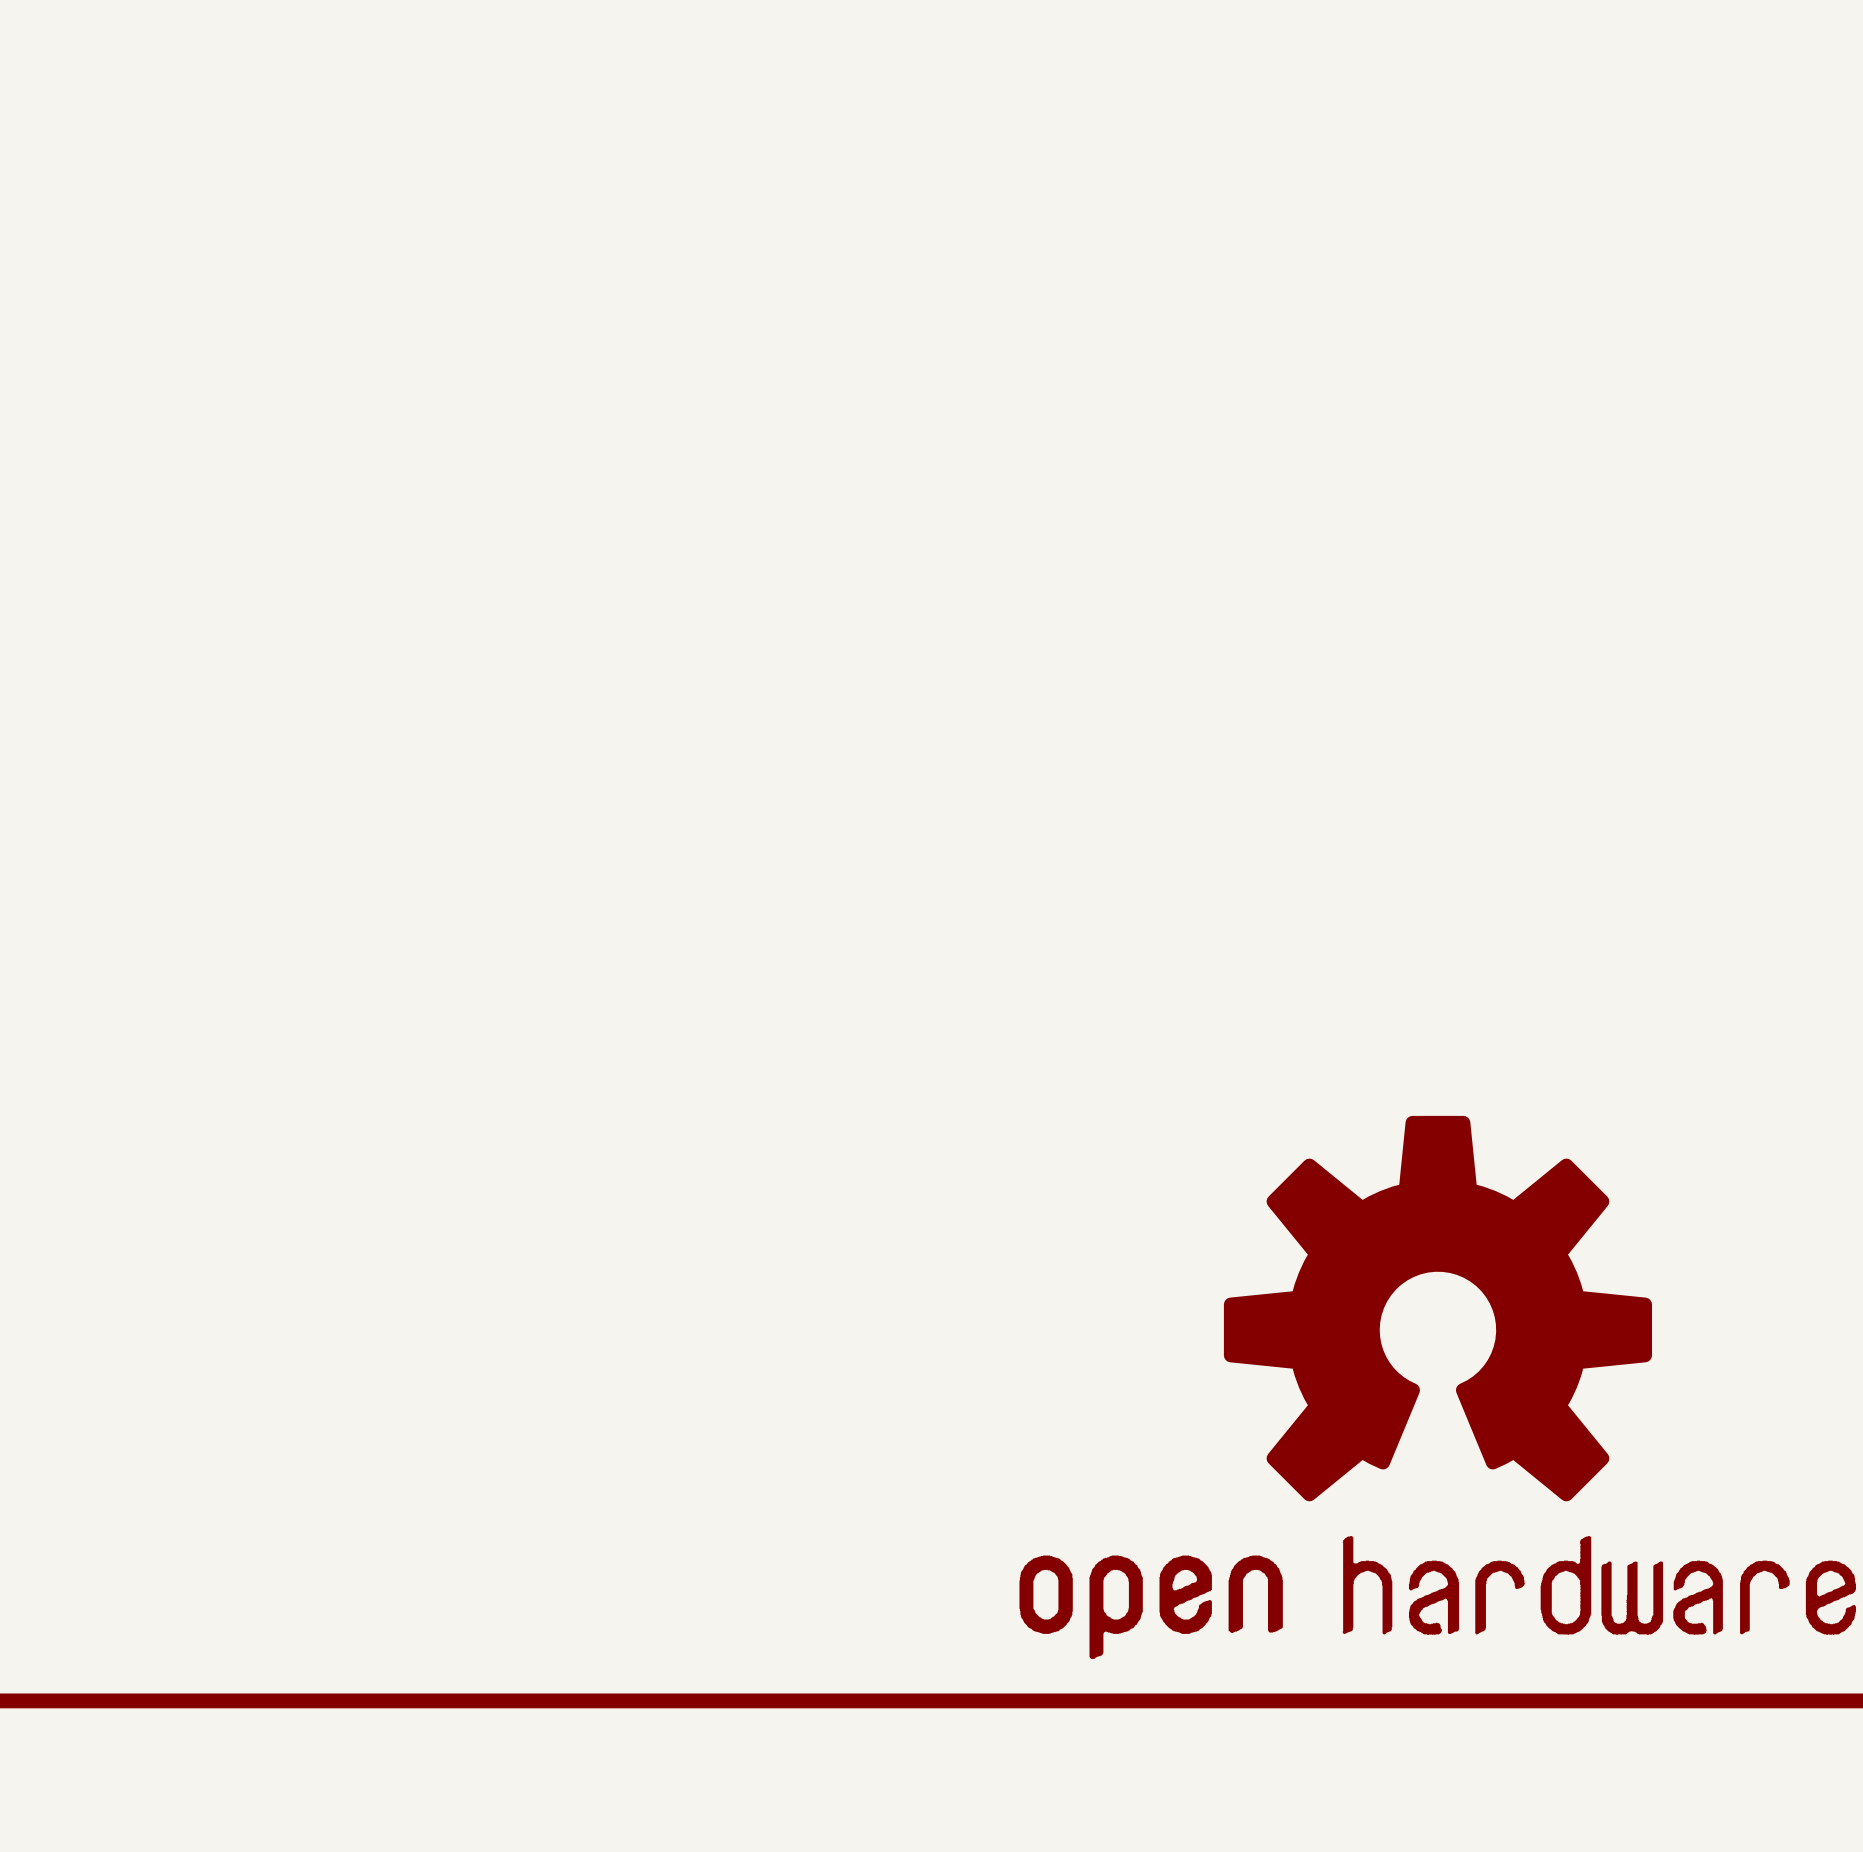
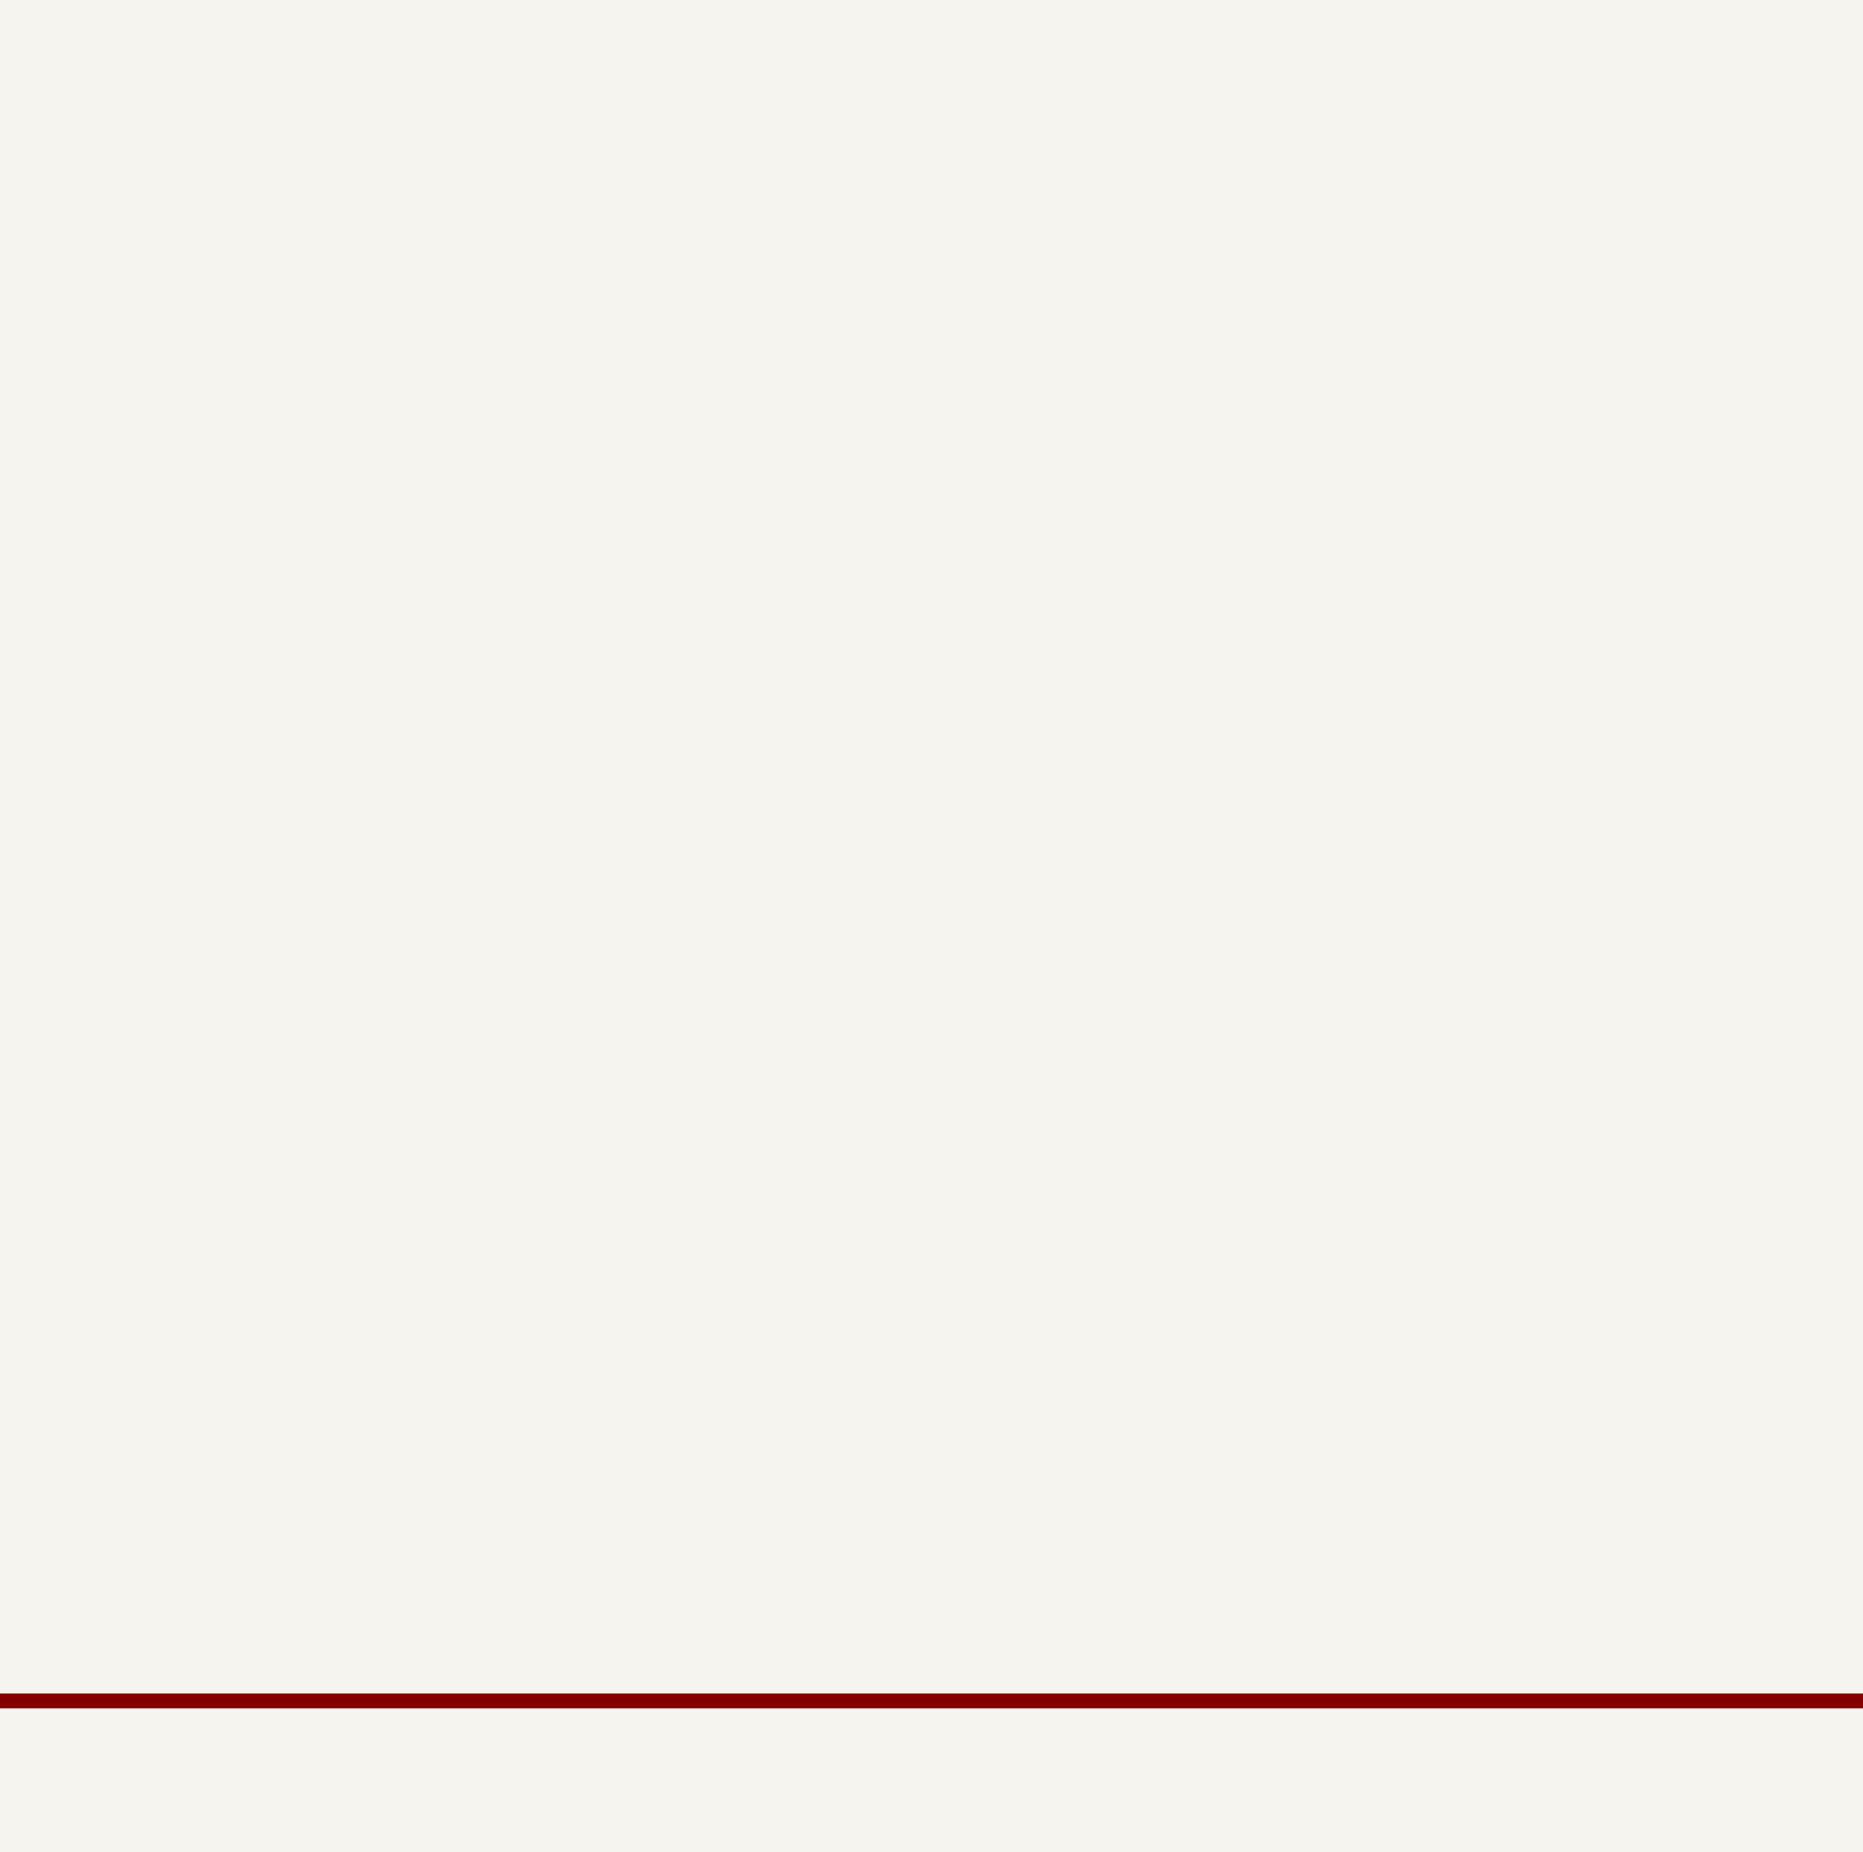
part: (1437, 1387) -> none

